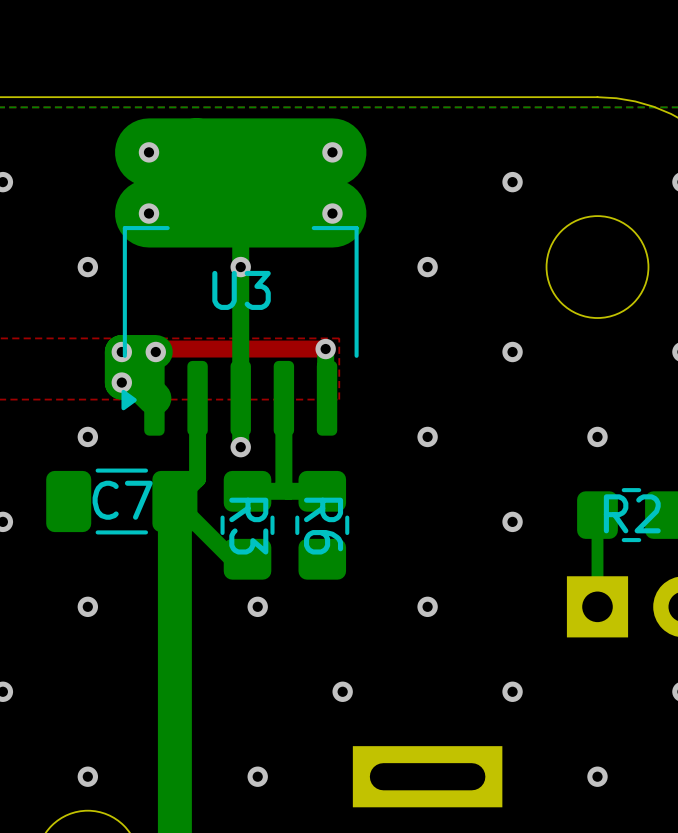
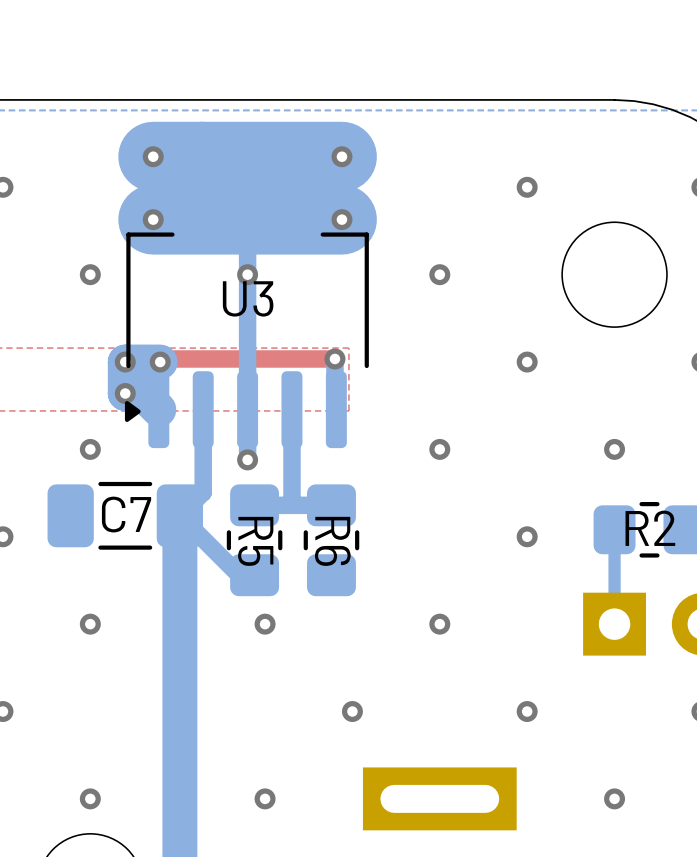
R3 name: R3 (248, 526) -> R5 (255, 541)

